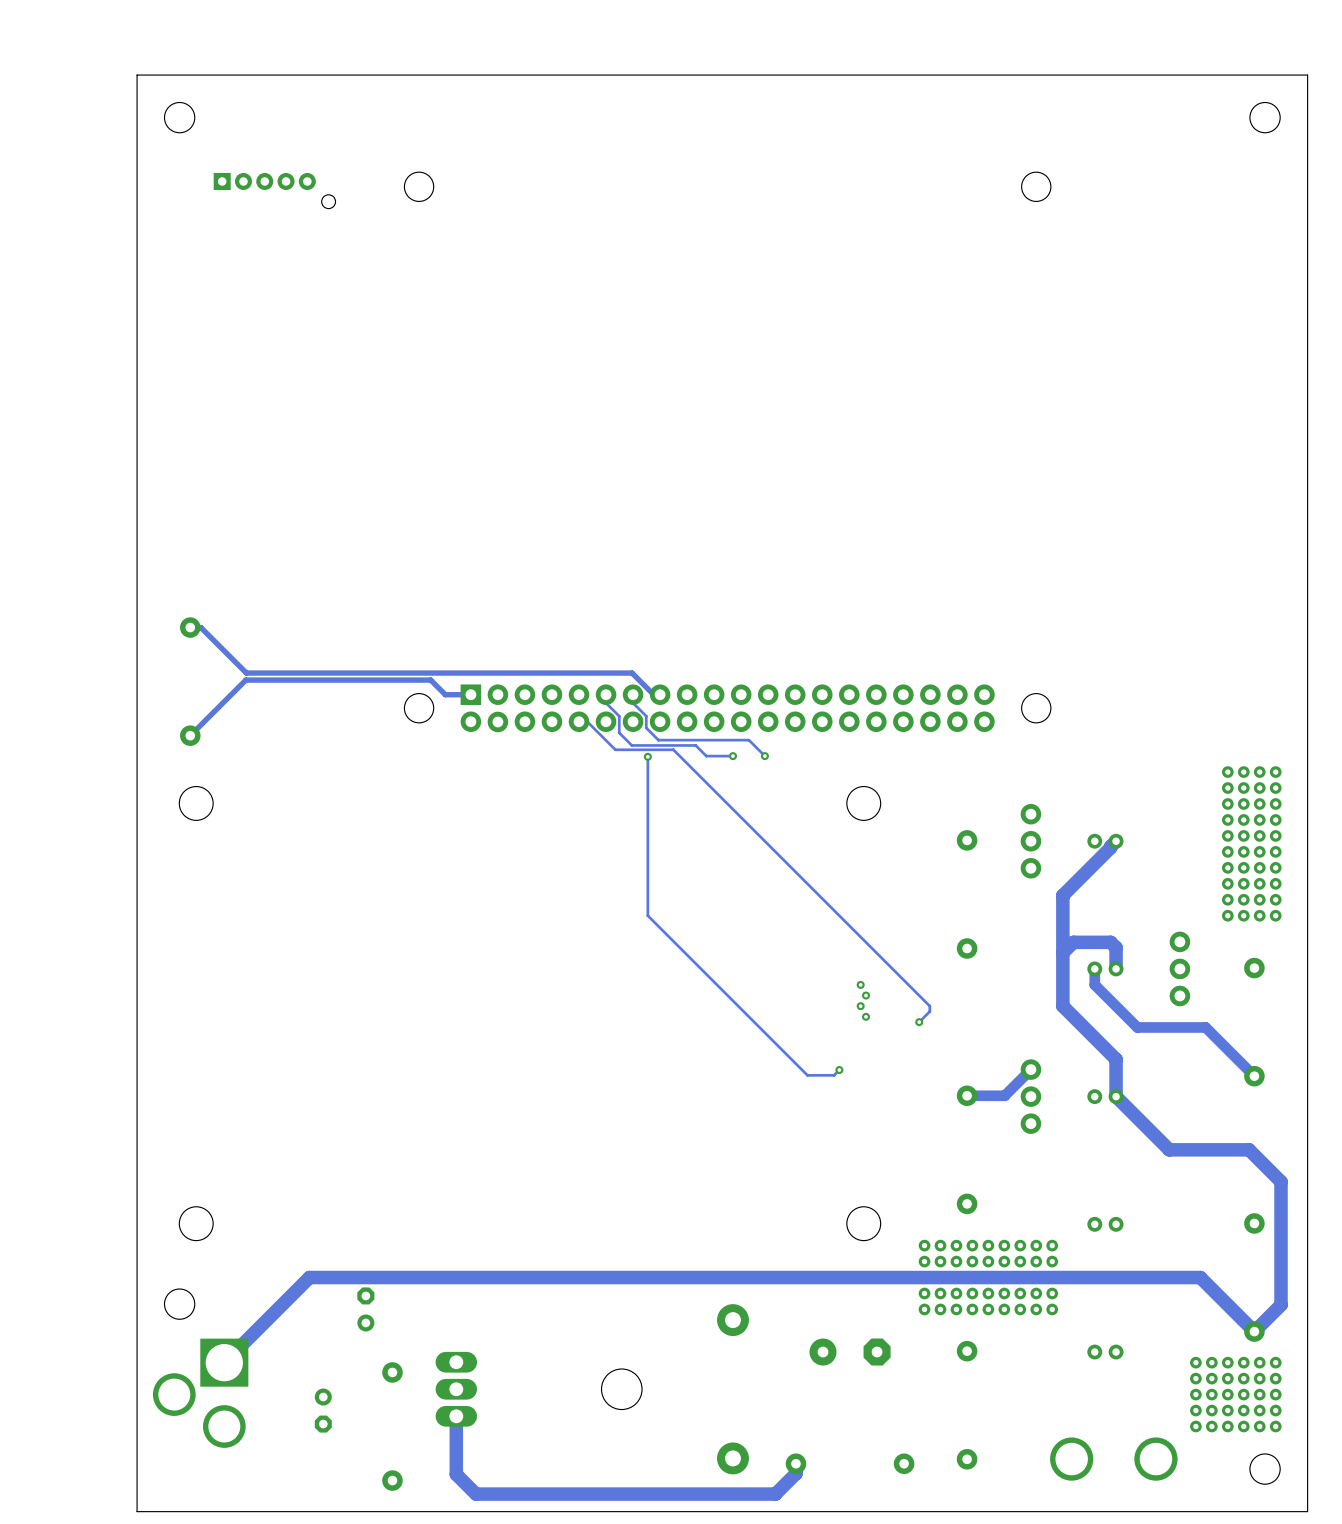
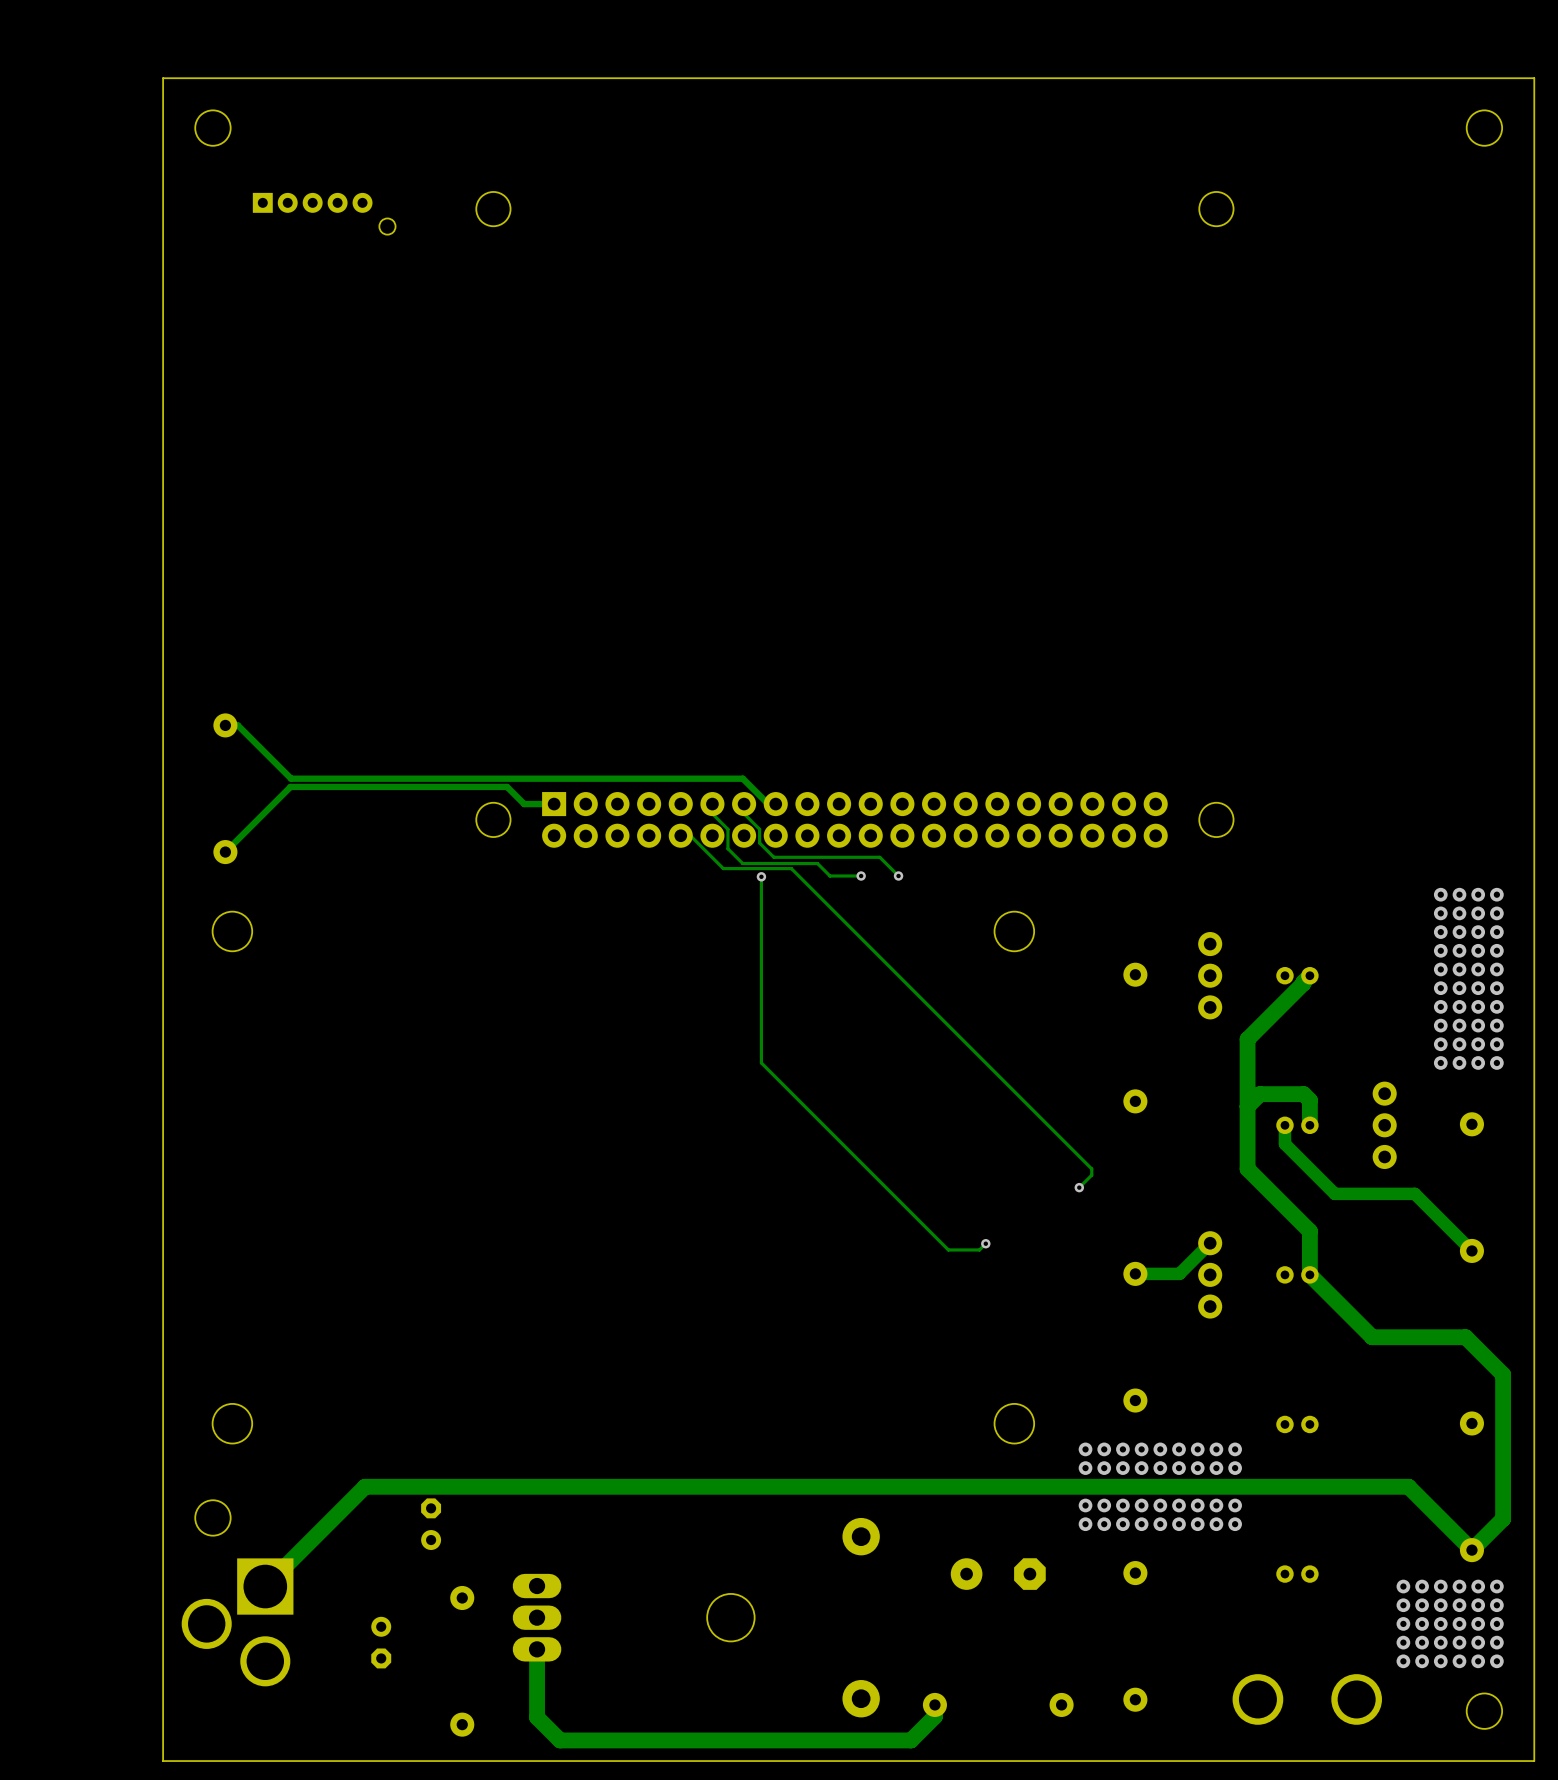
via: (860, 984) -> none
via: (866, 995) -> none
via: (860, 1006) -> none
via: (866, 1016) -> none

